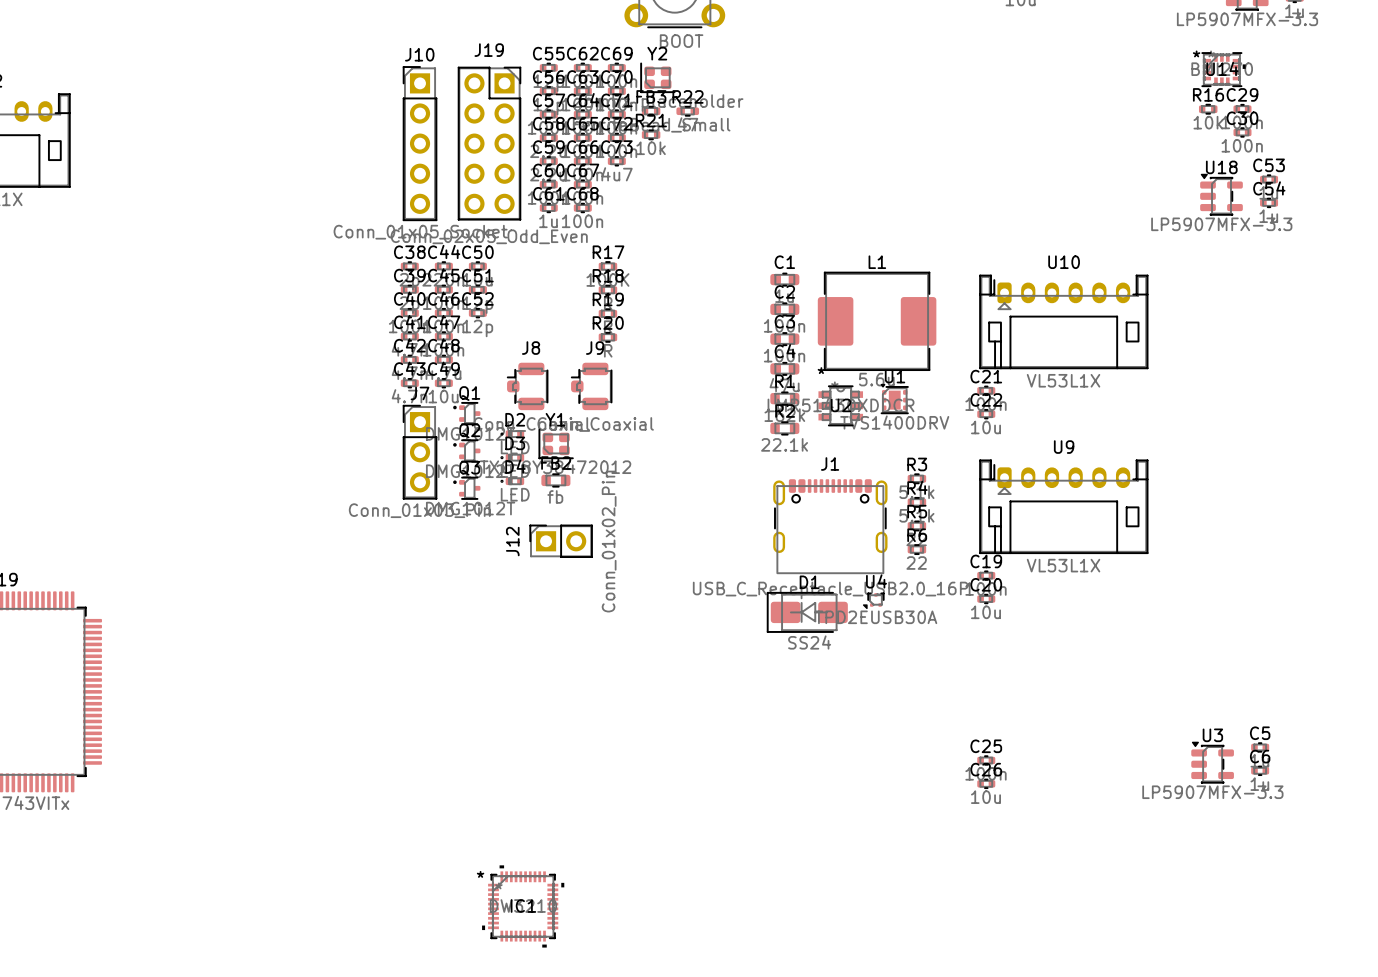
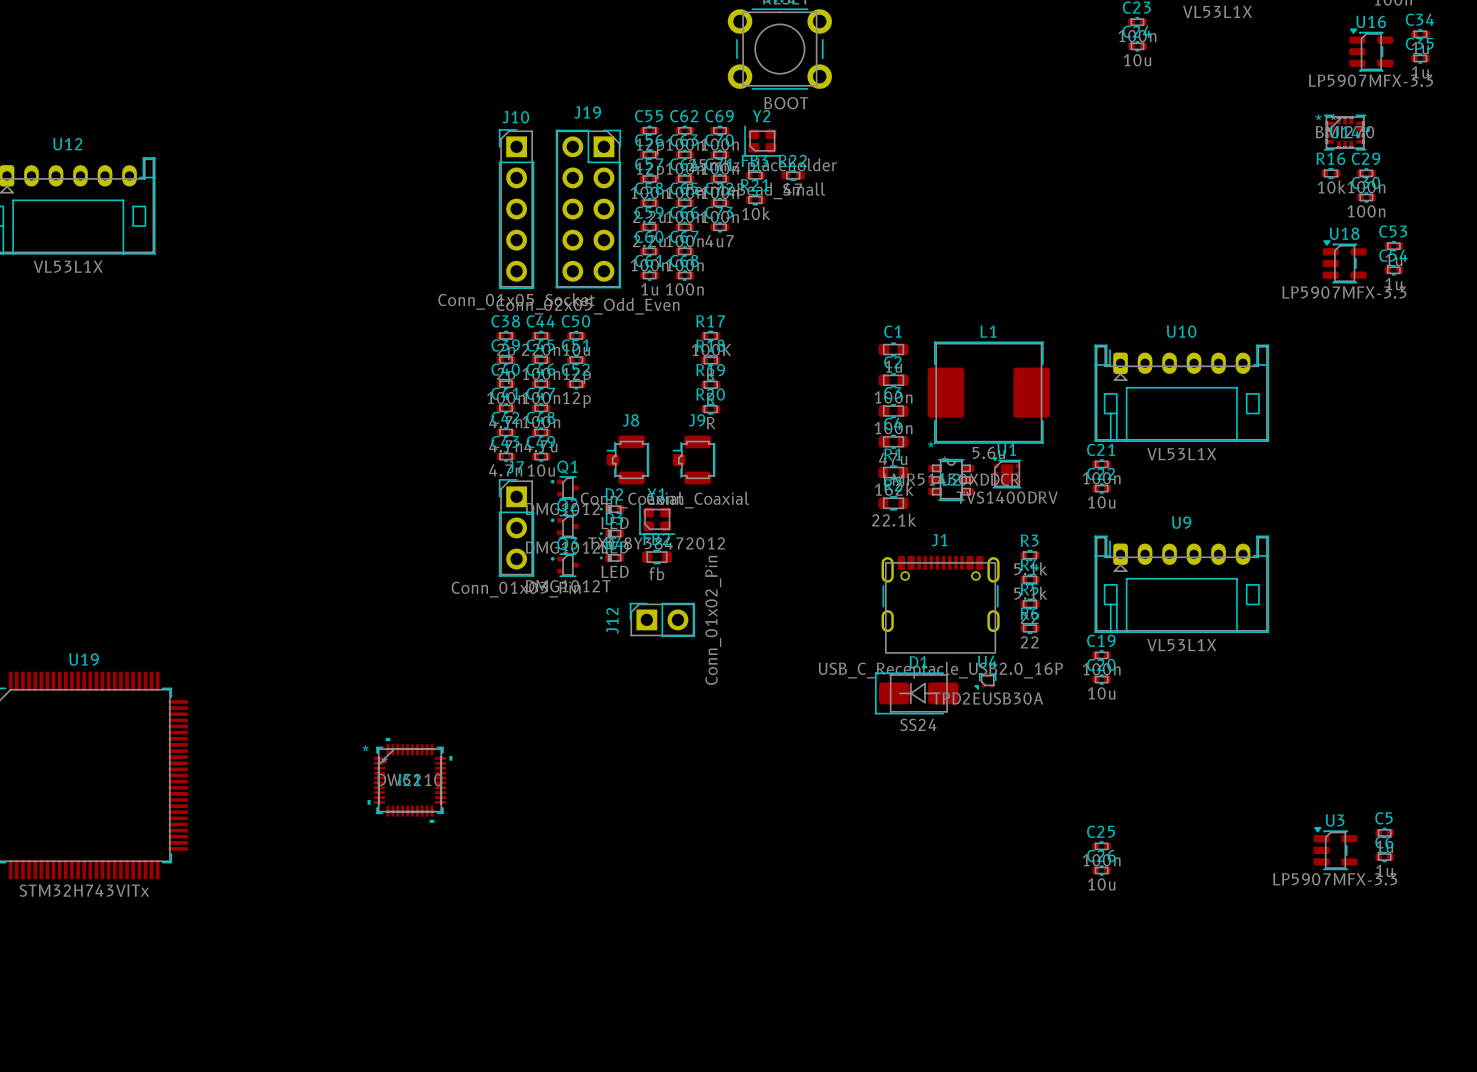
IC1 position: (523, 906) -> (410, 780)

